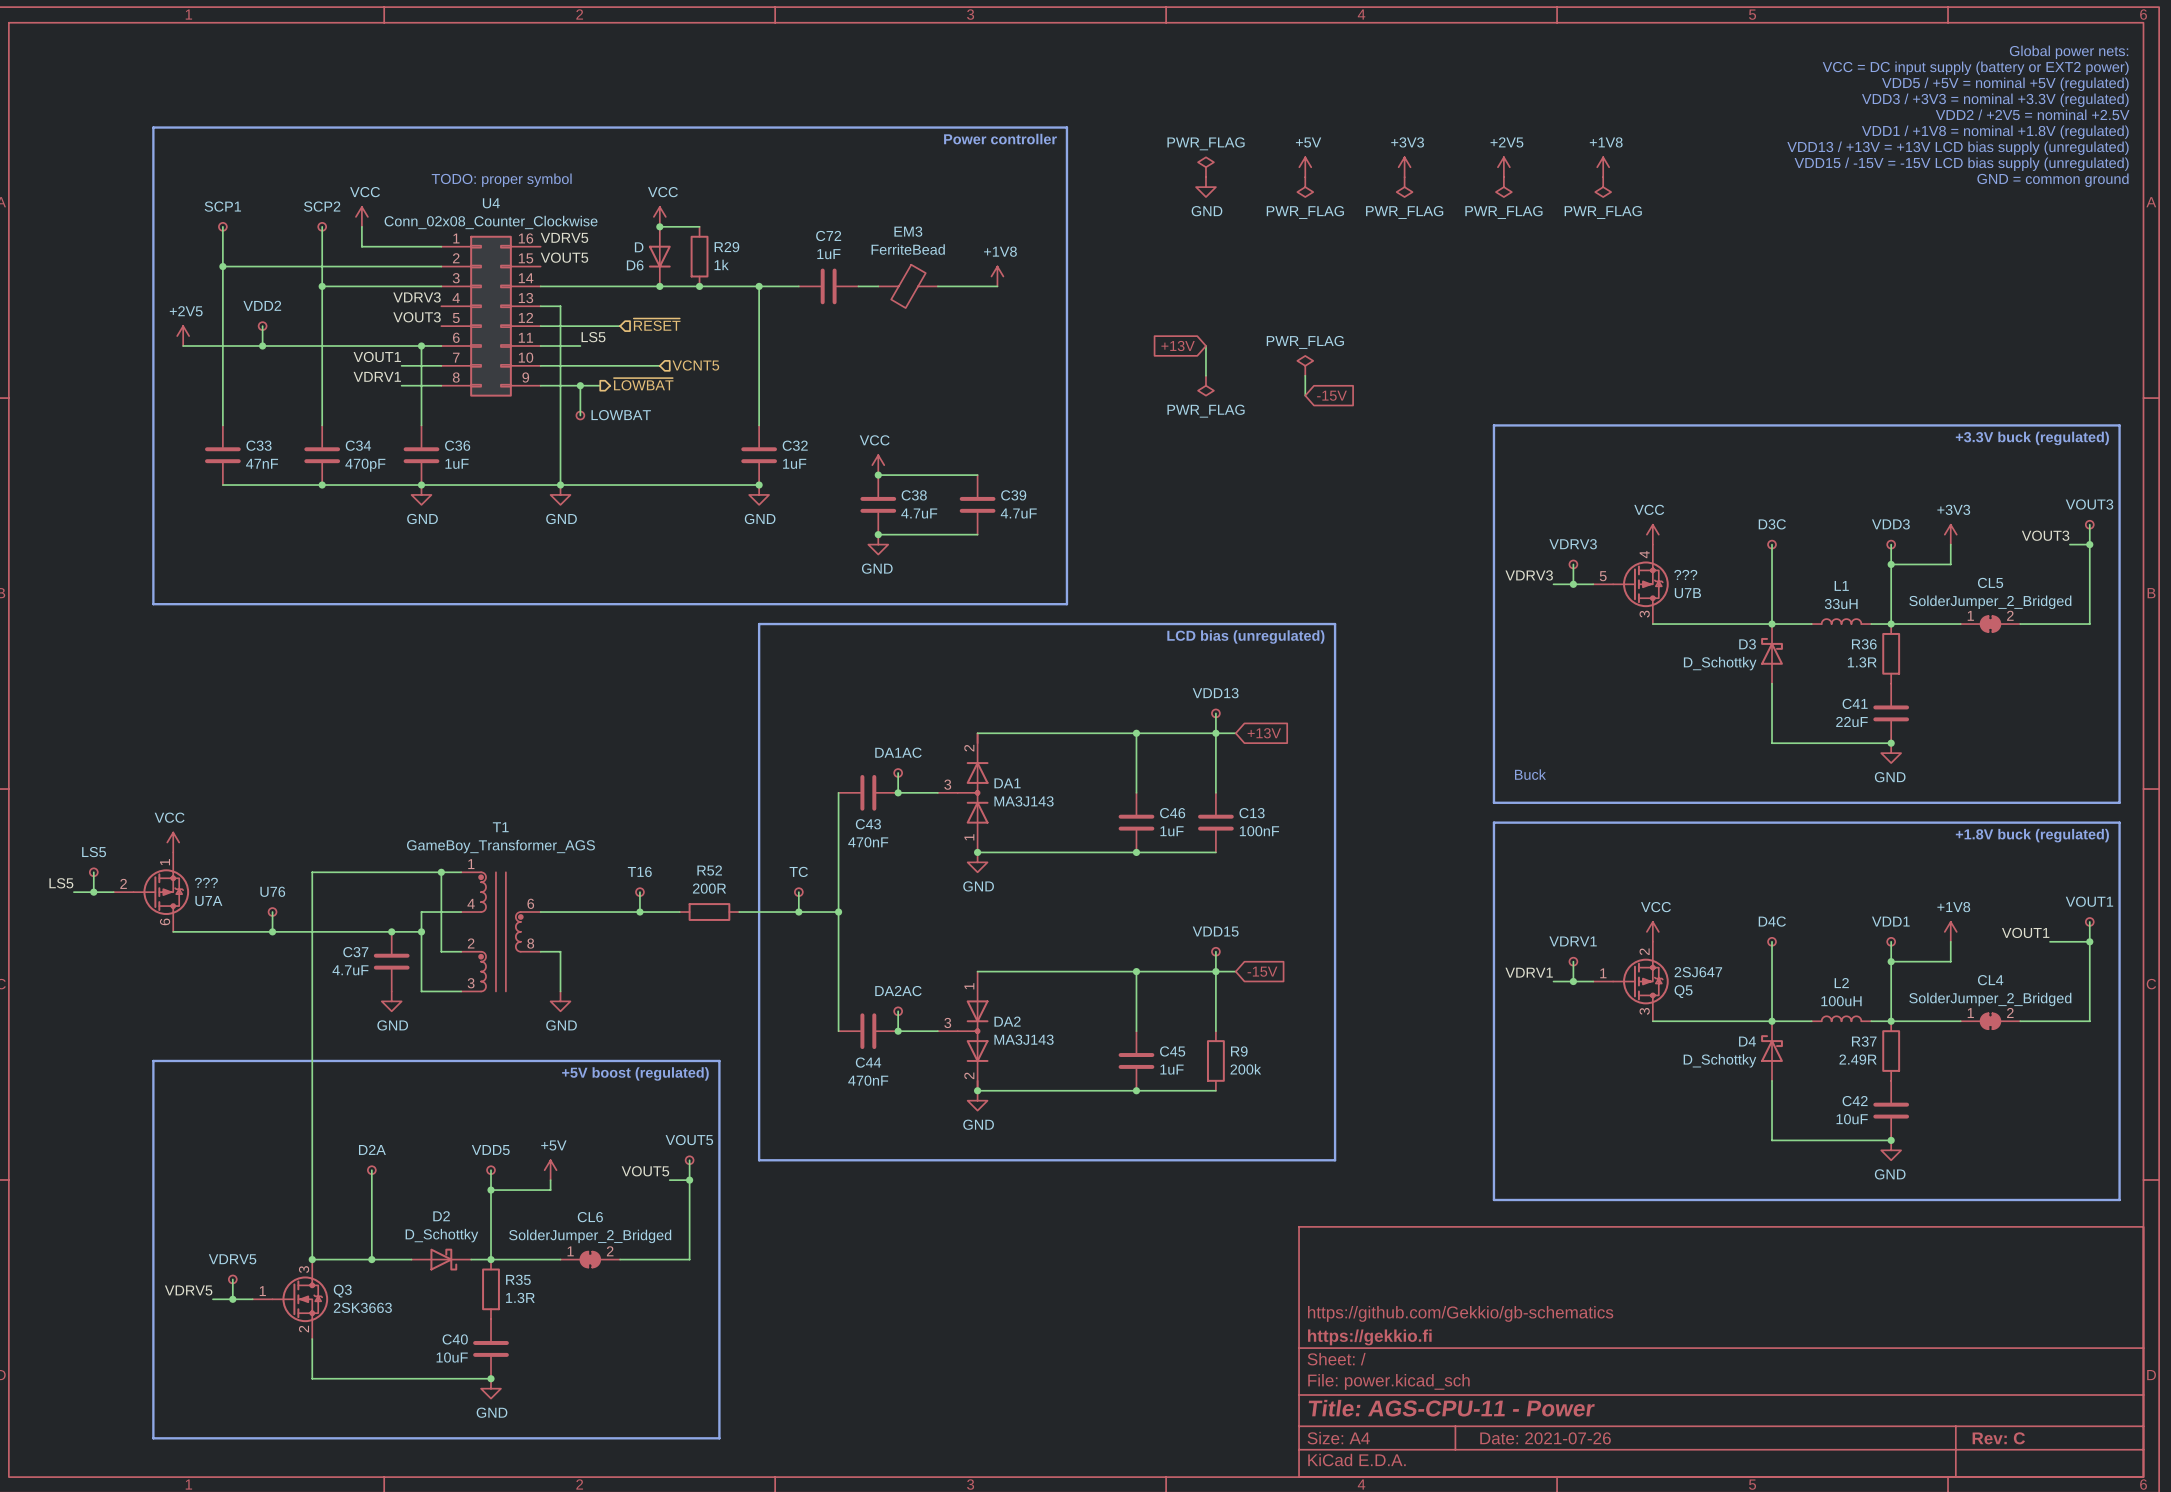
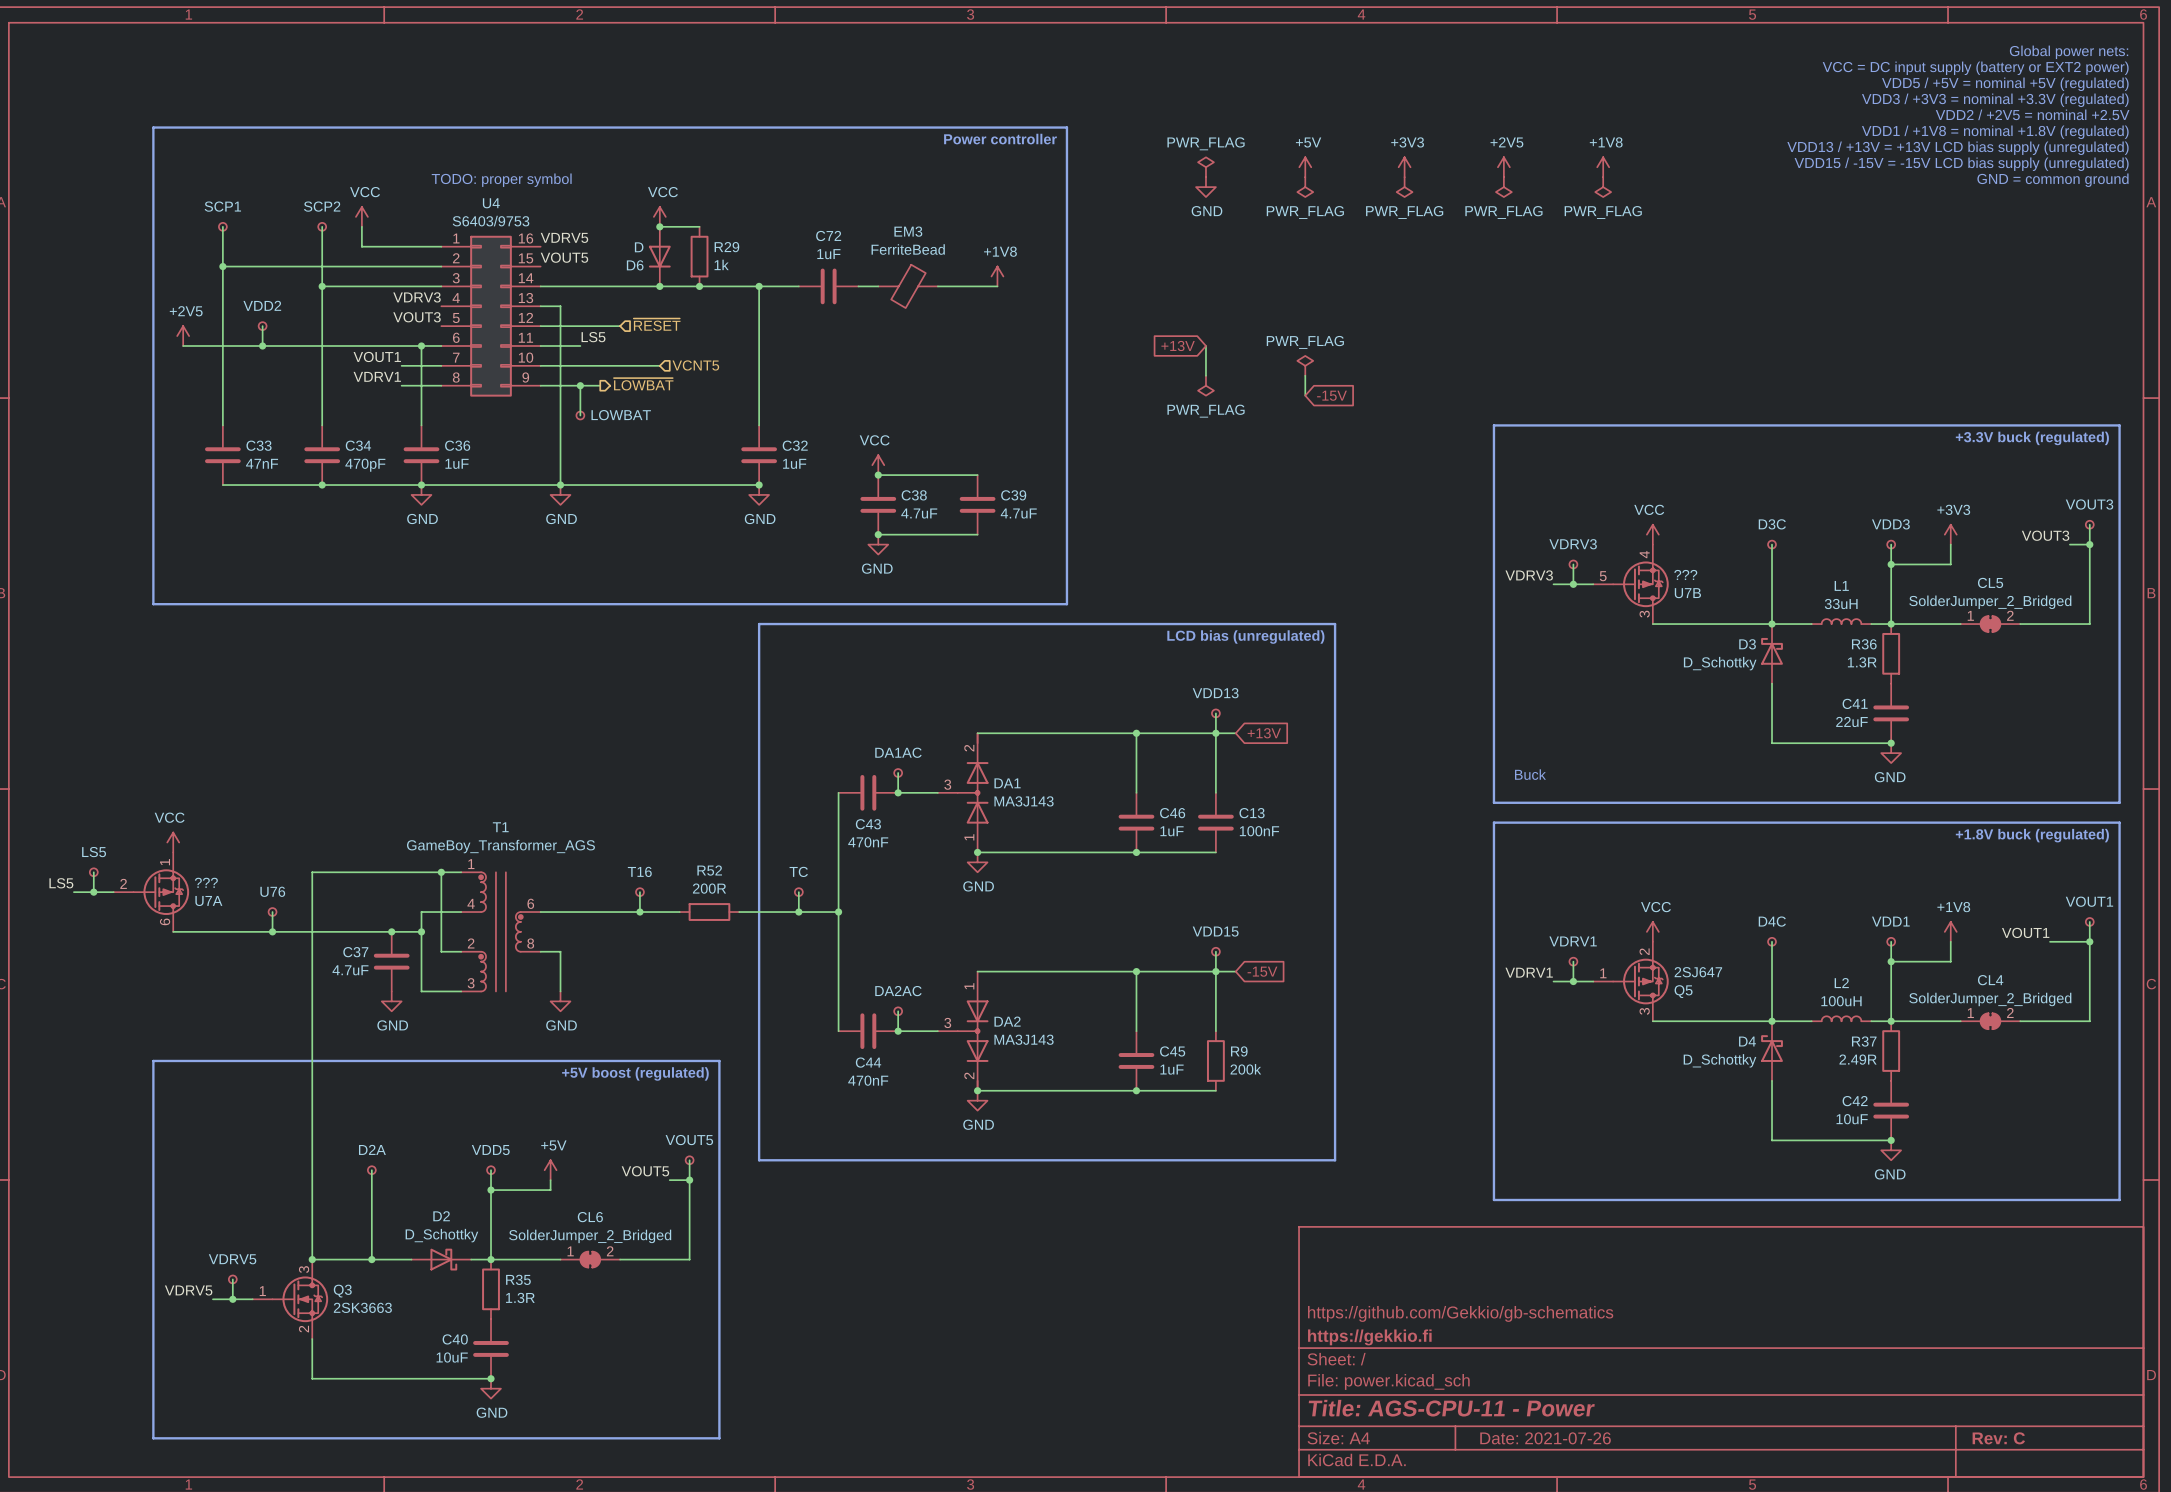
U4 value: Conn_02x08_Counter_Clockwise (491, 222) -> S6403/9753 (491, 221)

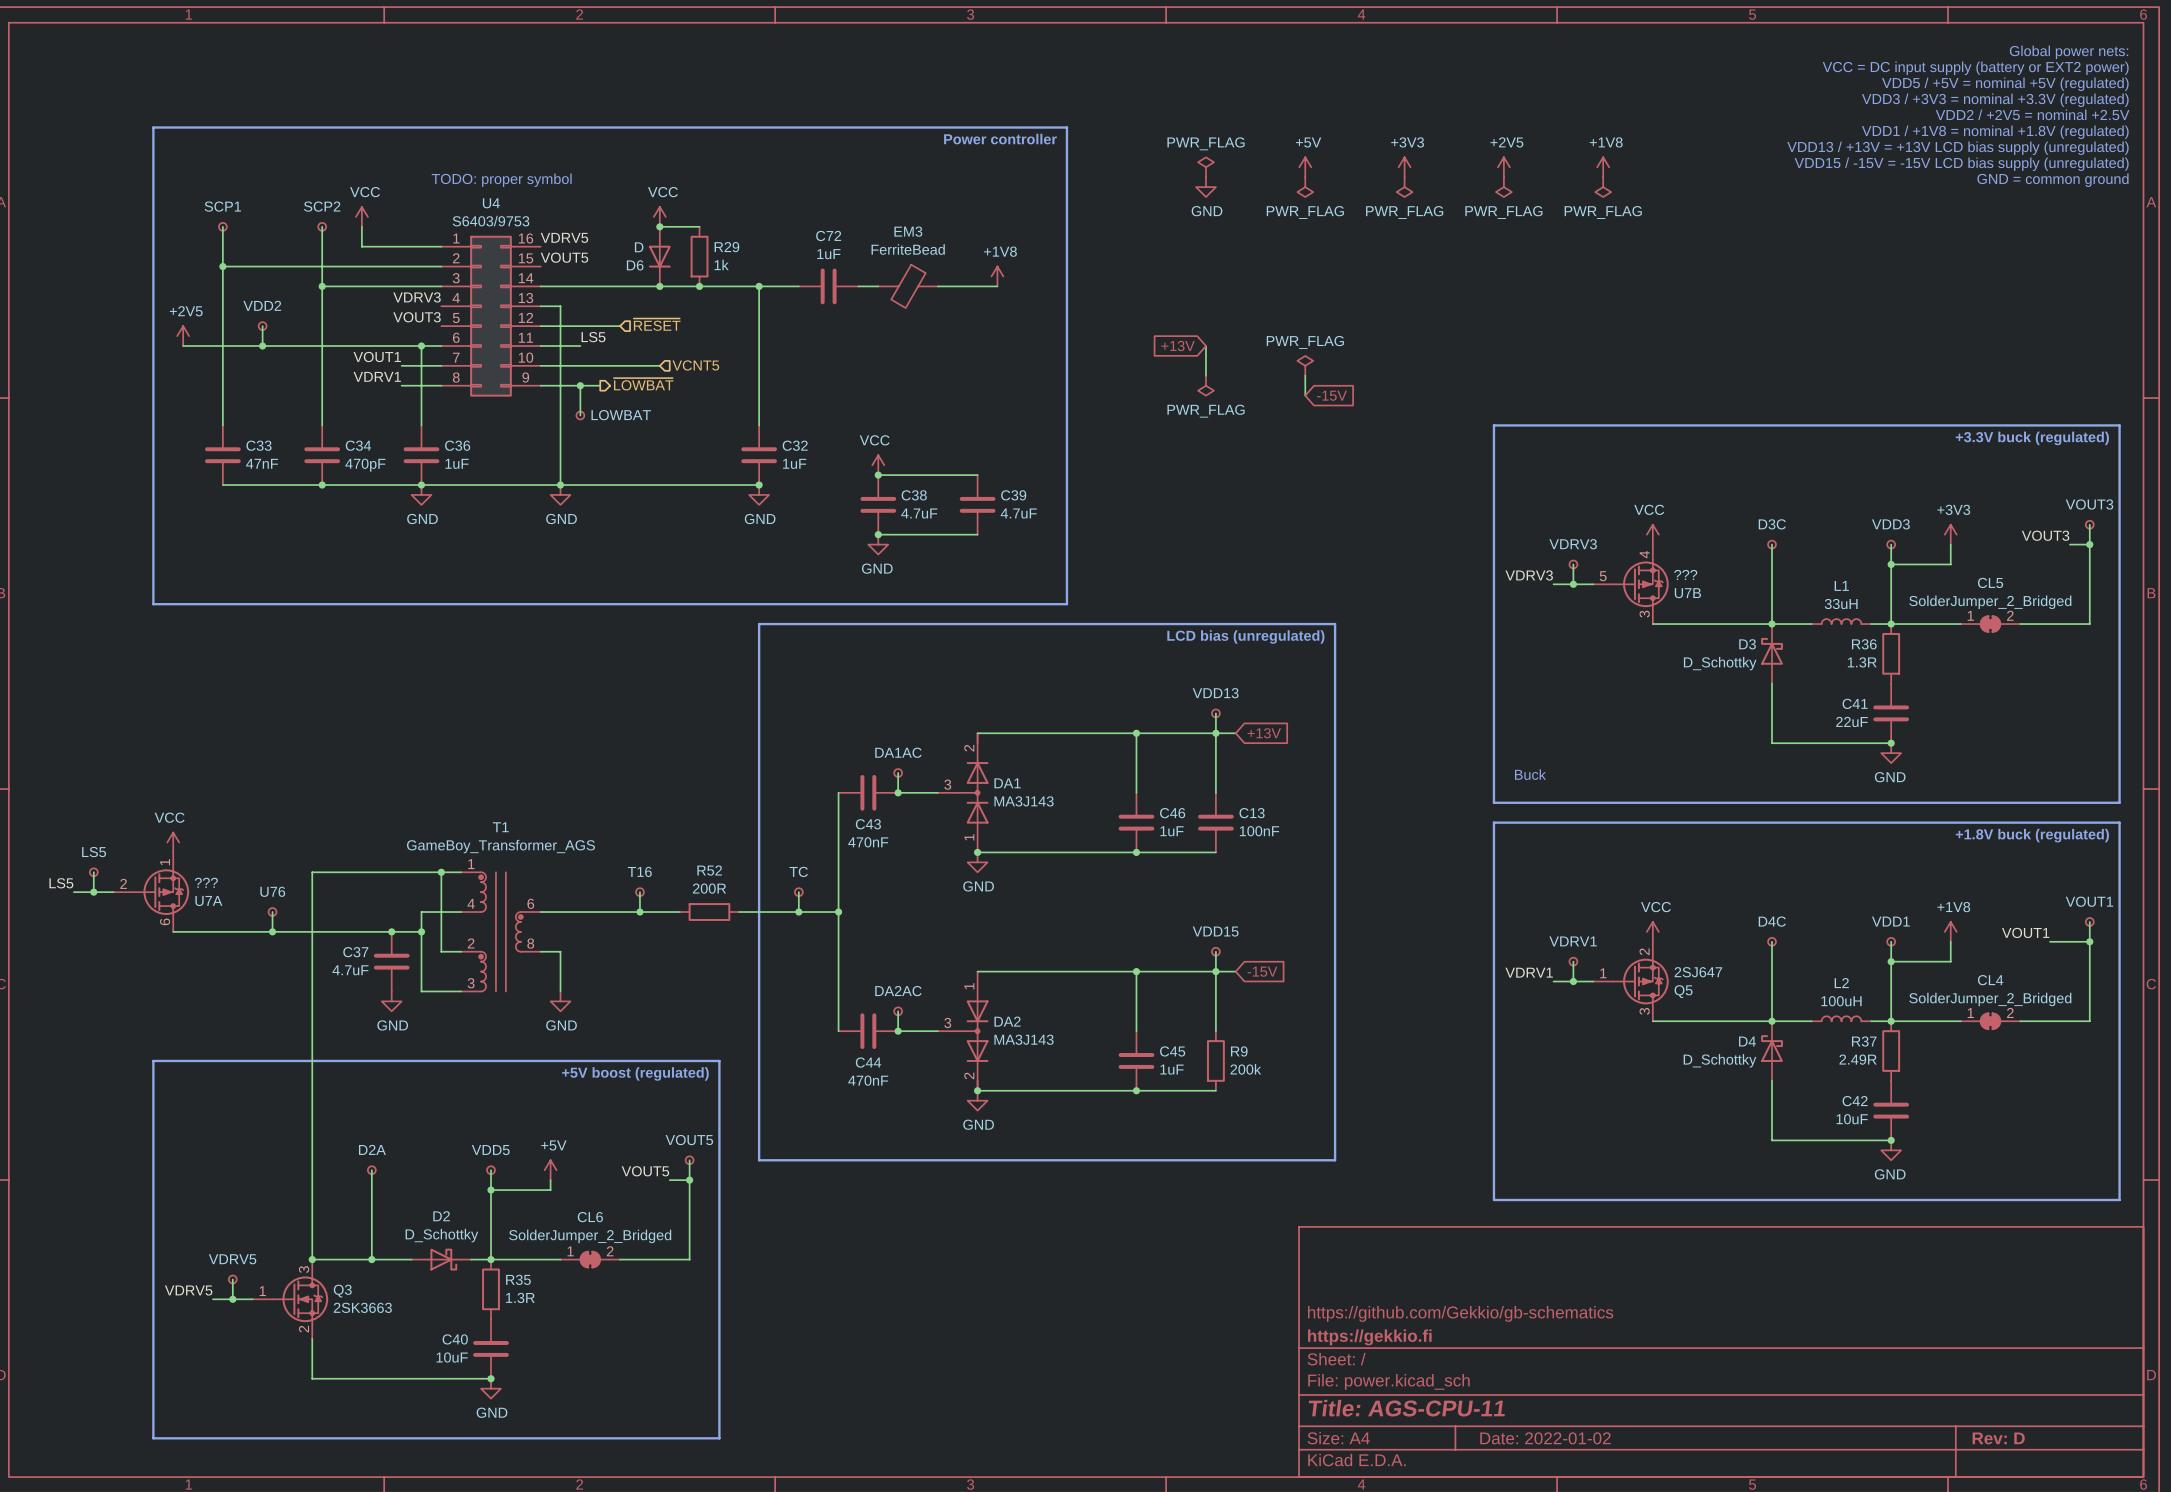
title block: Title: AGS-CPU-11 - Power (1451, 1408) -> Title: AGS-CPU-11 (1406, 1408)
title block: Date: 2021-07-26 (1545, 1438) -> Date: 2022-01-02 (1545, 1438)
title block: Rev: C (1998, 1438) -> Rev: D (1998, 1438)

